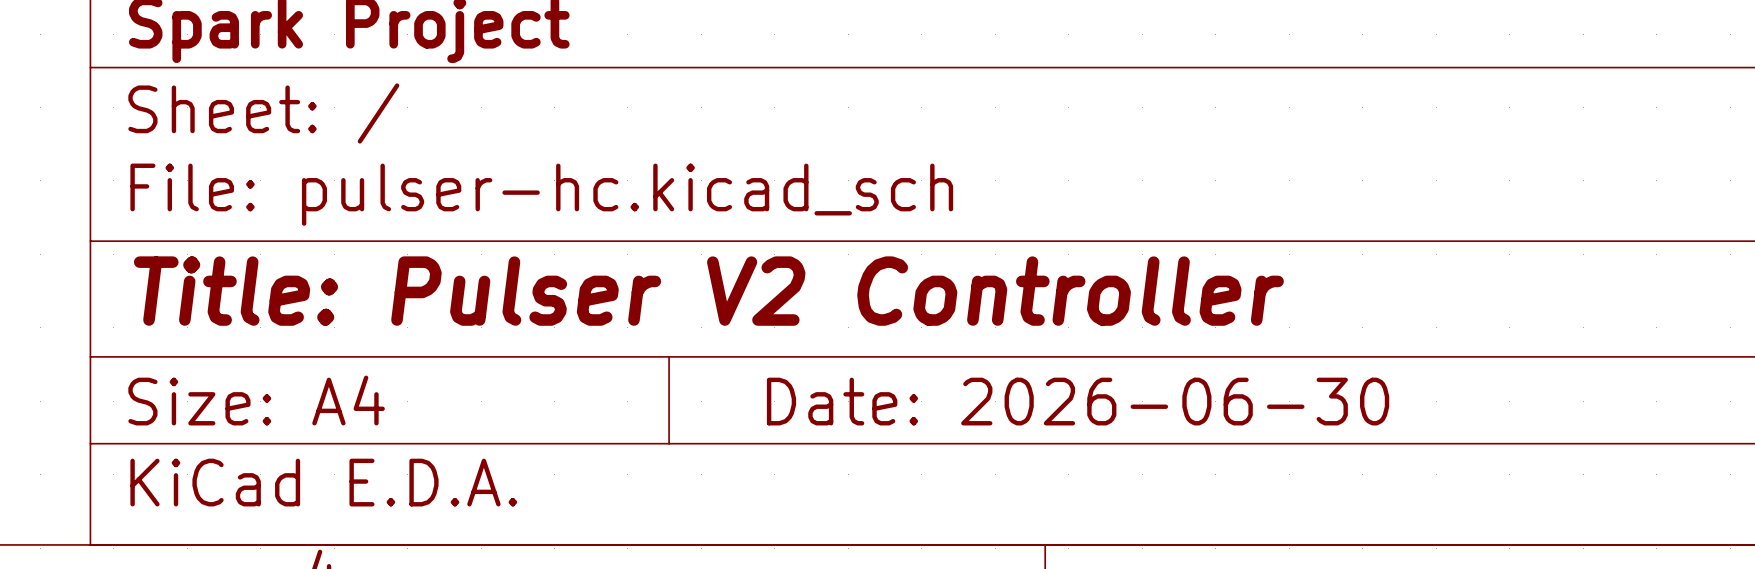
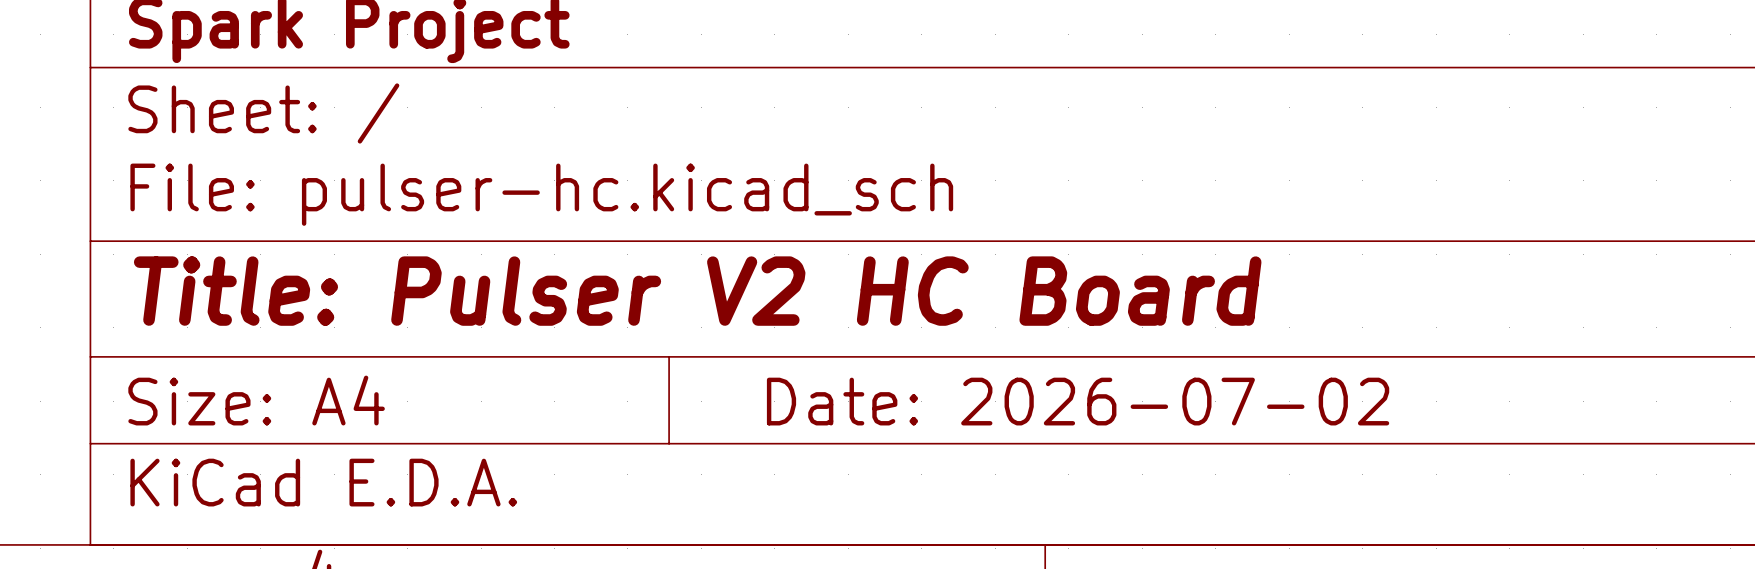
title block: Title: Pulser V2 Controller (708, 291) -> Title: Pulser V2 HC Board (697, 291)
title block: Date: 2026-06-30 (1078, 401) -> Date: 2026-07-02 (1078, 401)

